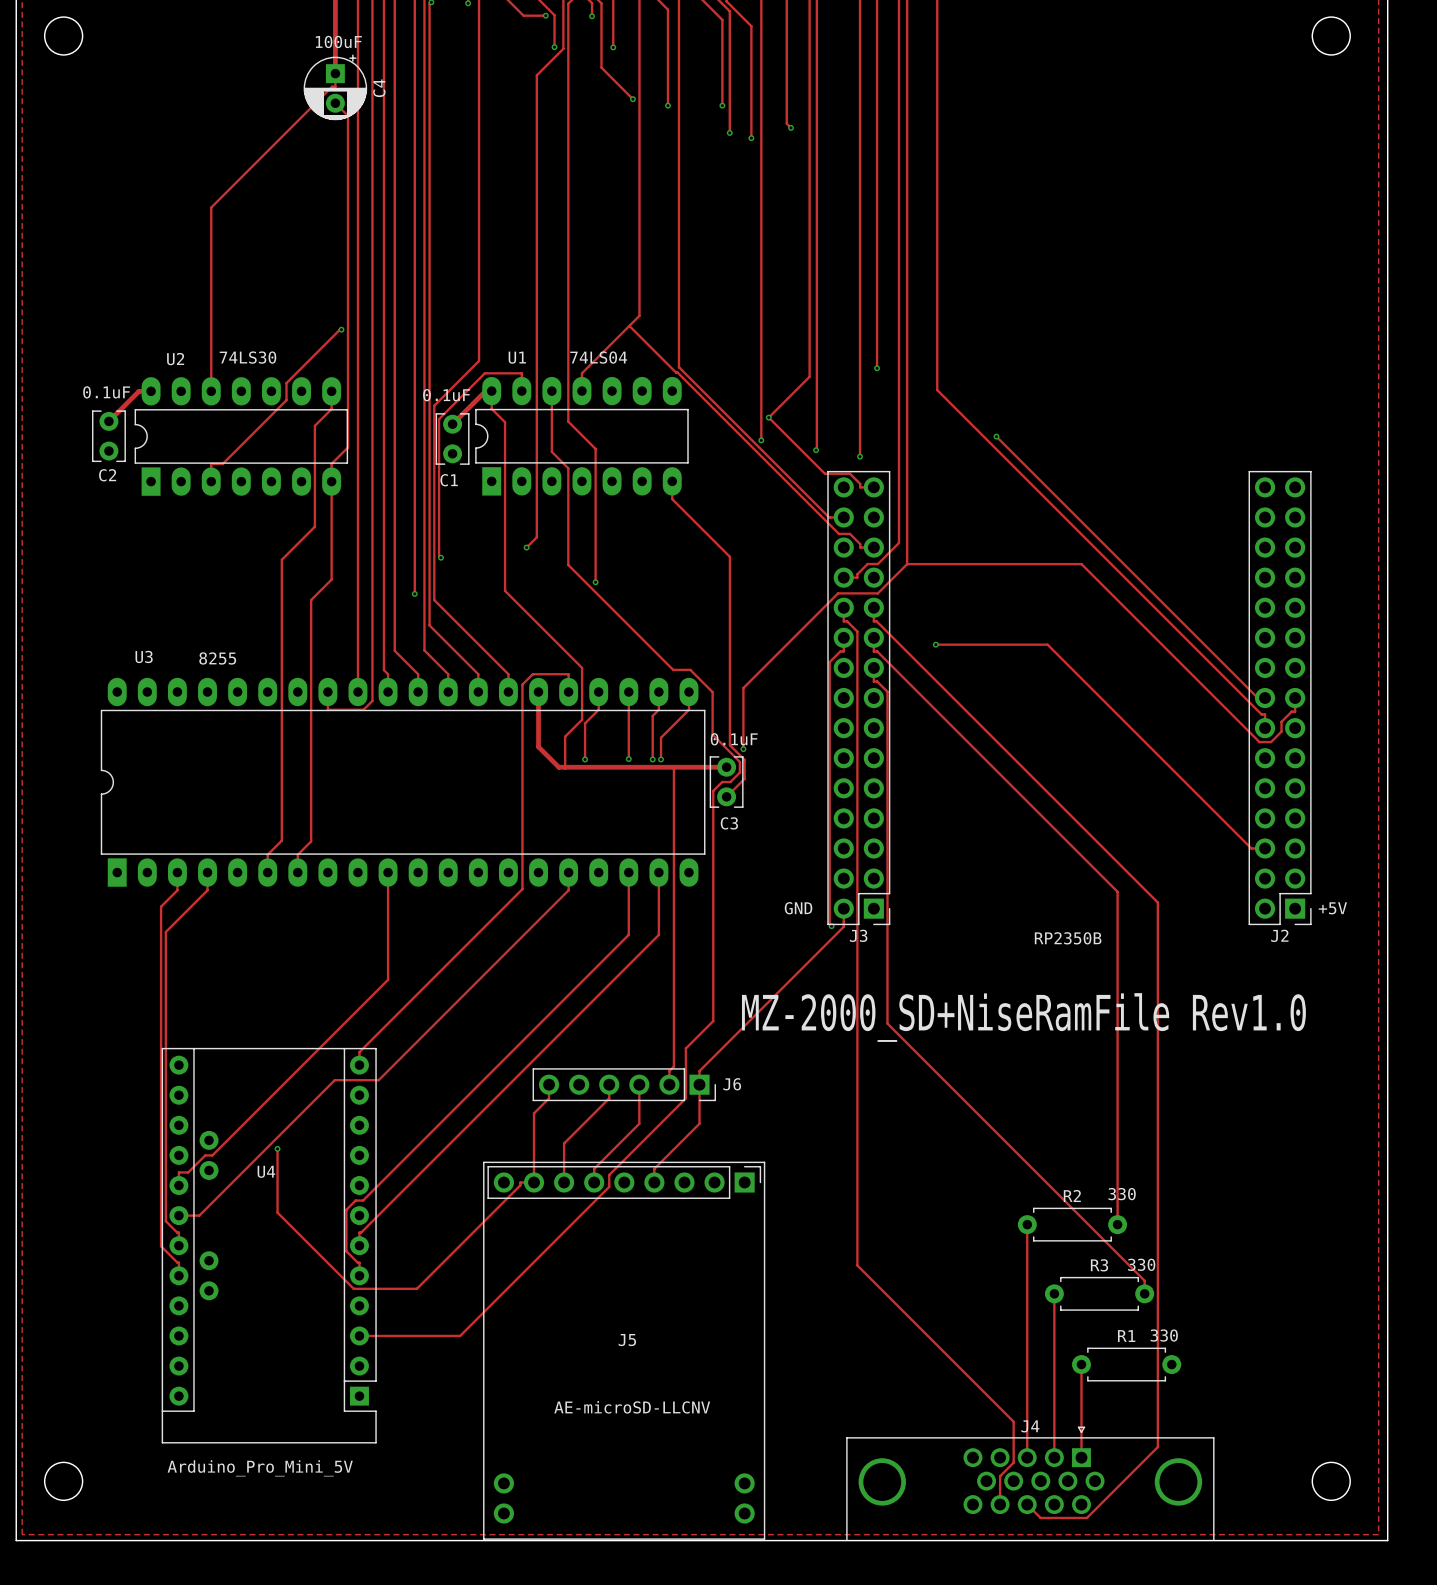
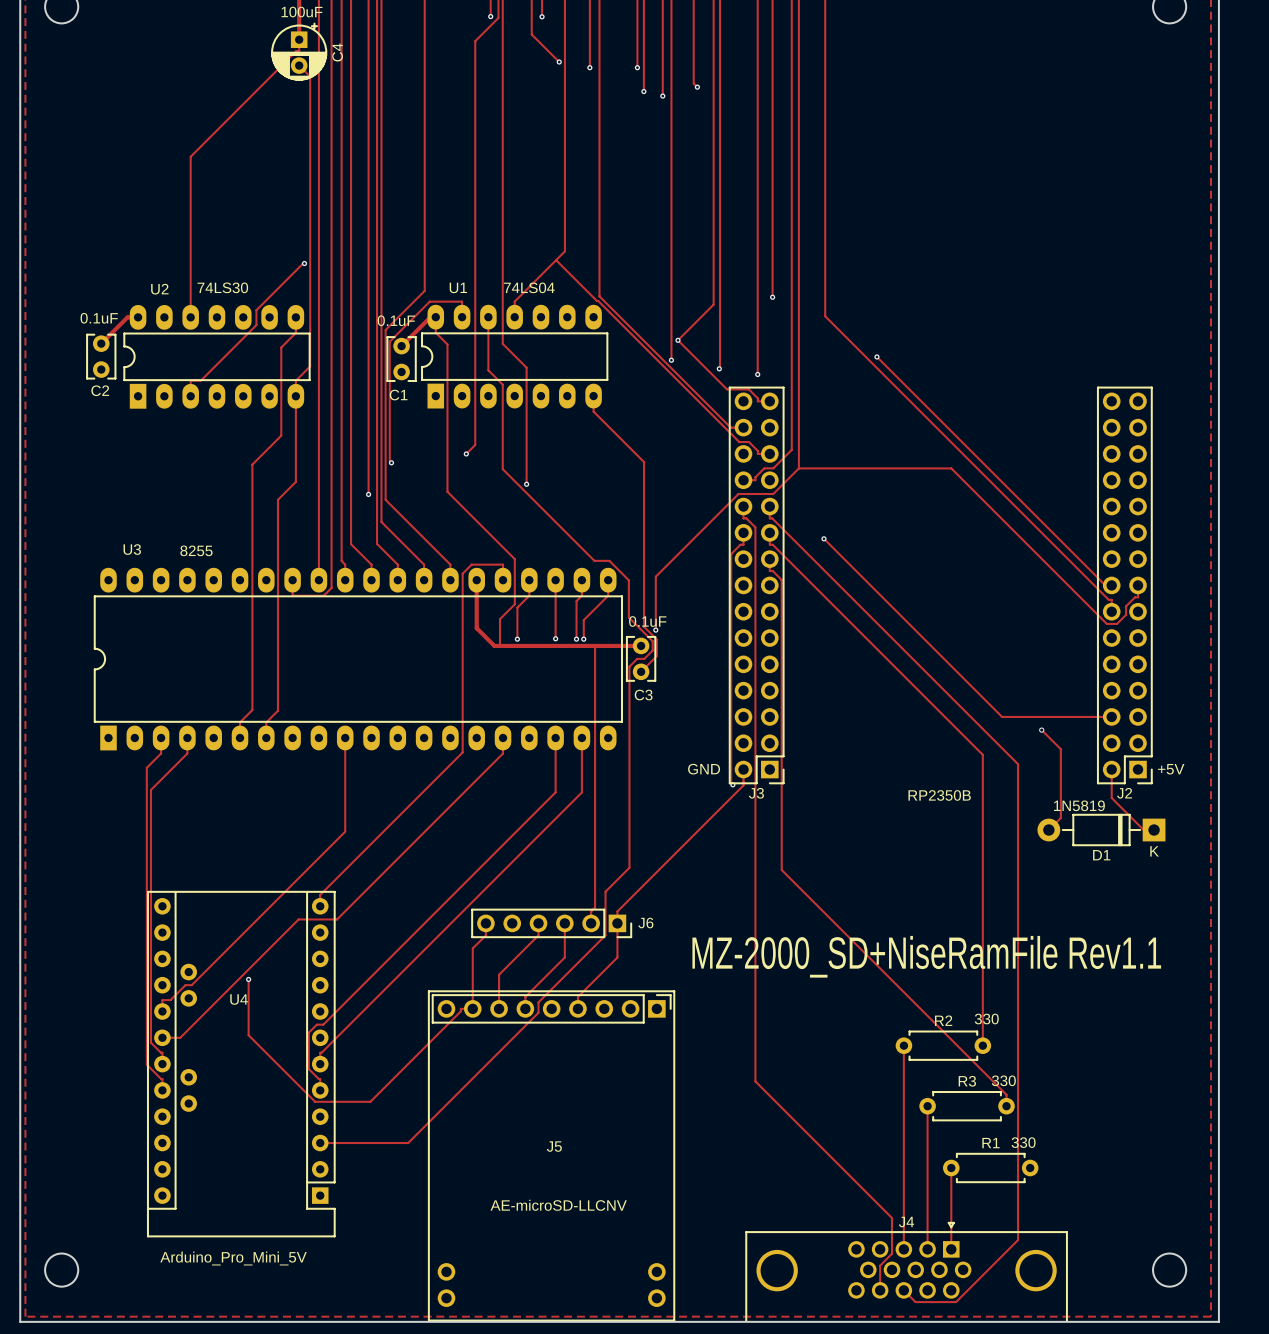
track: (935, 644) (1047, 644) (1251, 848) -> (823, 538) (1002, 716) (1099, 716)
track: none -> (1041, 730) (1060, 749) (1060, 818) (1048, 830)
via: none -> (1041, 730)
track: none -> (1111, 769) (1111, 798) (1143, 830) (1154, 830)
text: none -> 1N5819 (1079, 805)
D1: none -> (1101, 830)
text: MZ-2000_SD+NiseRamFile Rev1.0 (1023, 1017) -> none
text: none -> MZ-2000_SD+NiseRamFile Rev1.1 (926, 956)

